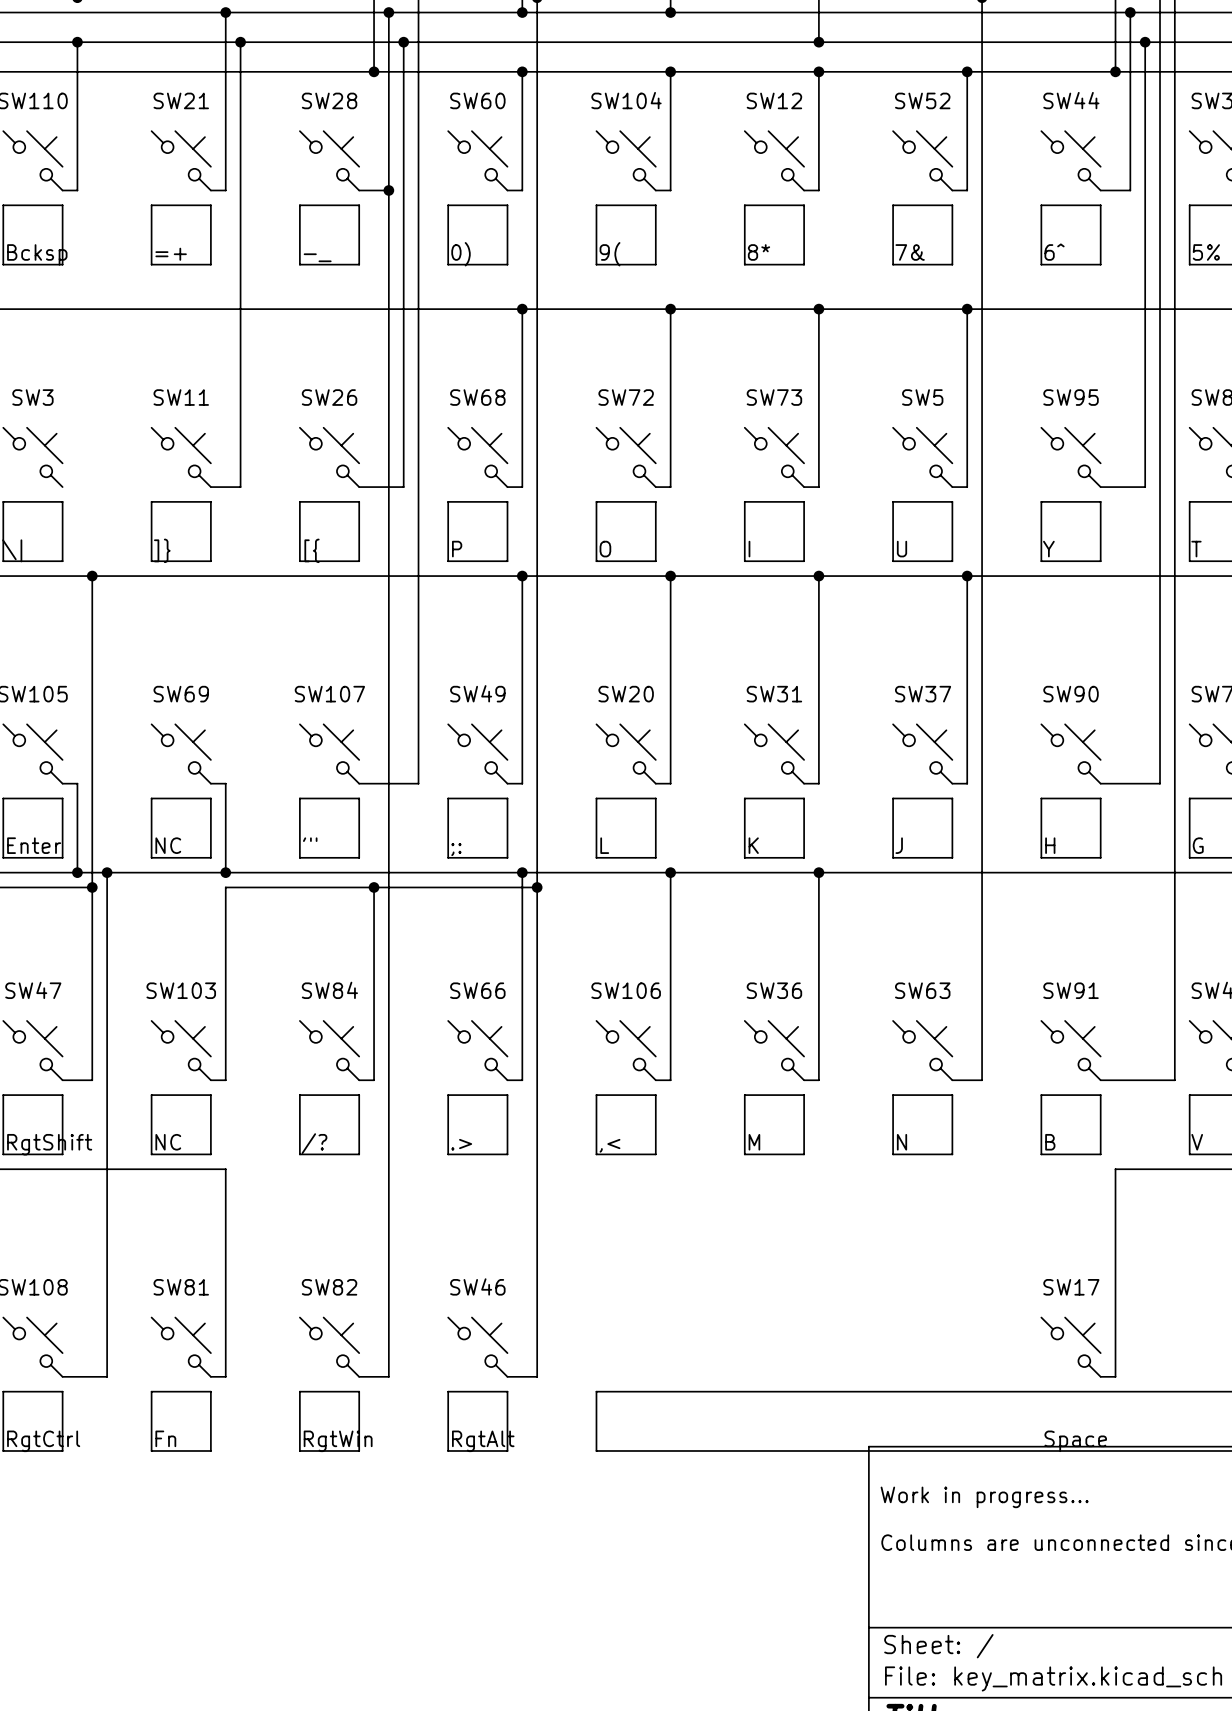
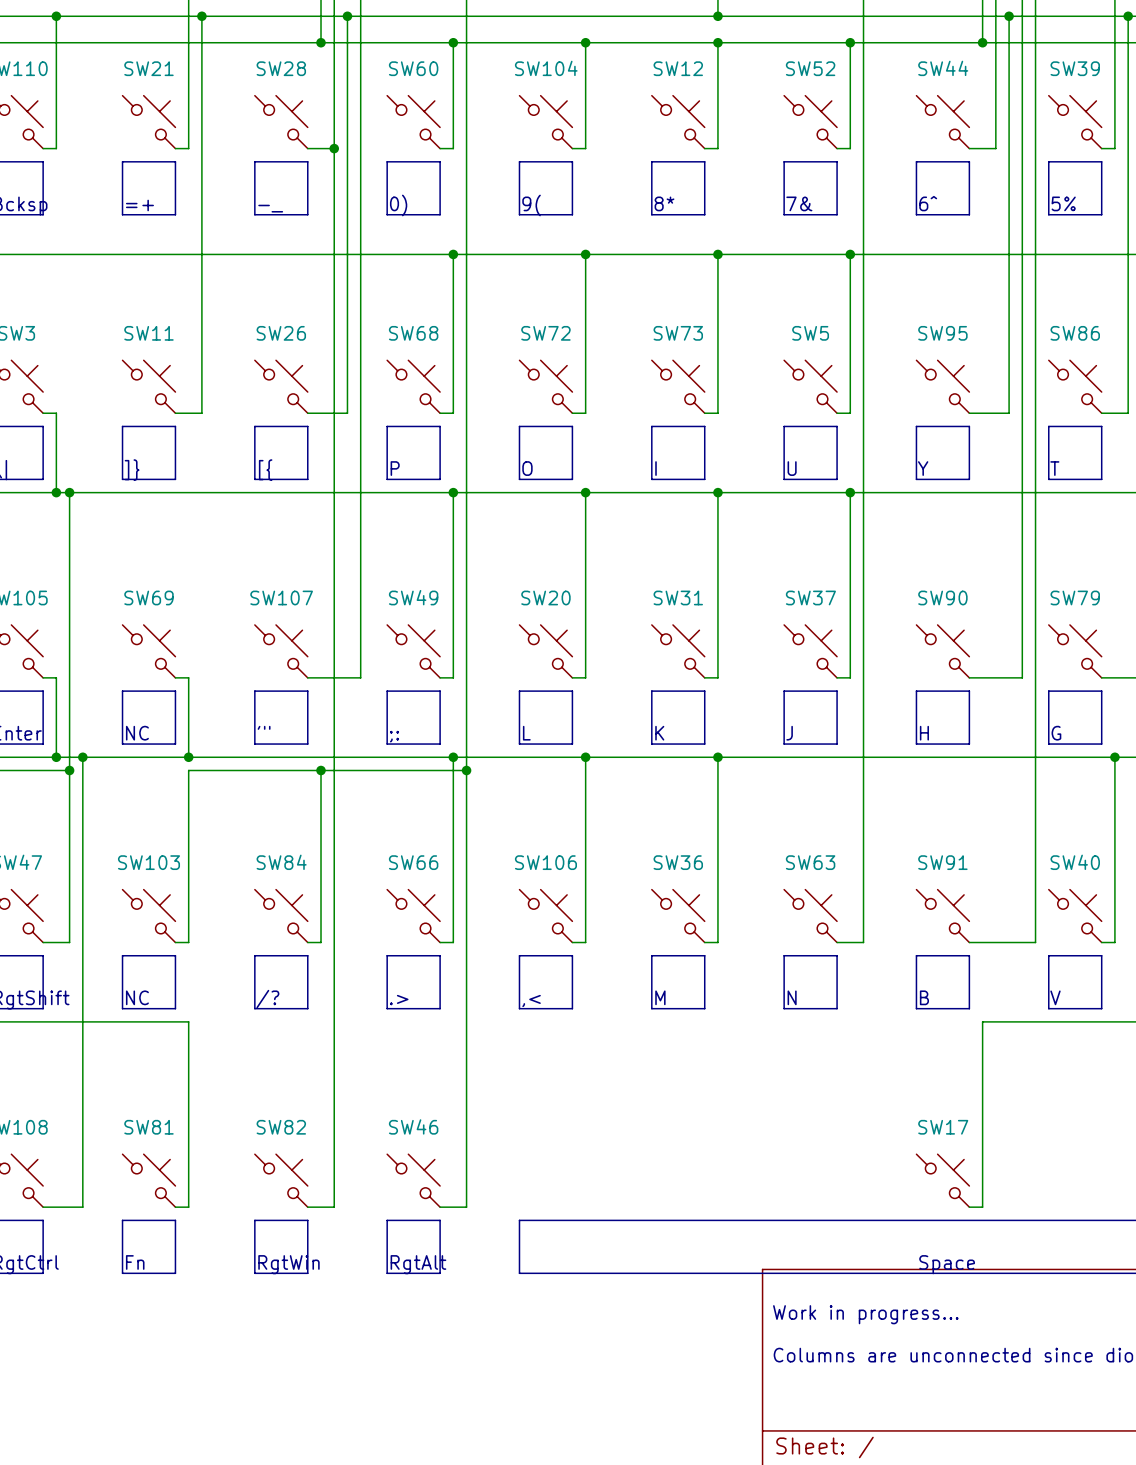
wire: none -> (43, 413) (56, 413) (56, 492)
junction: none -> (56, 492)

